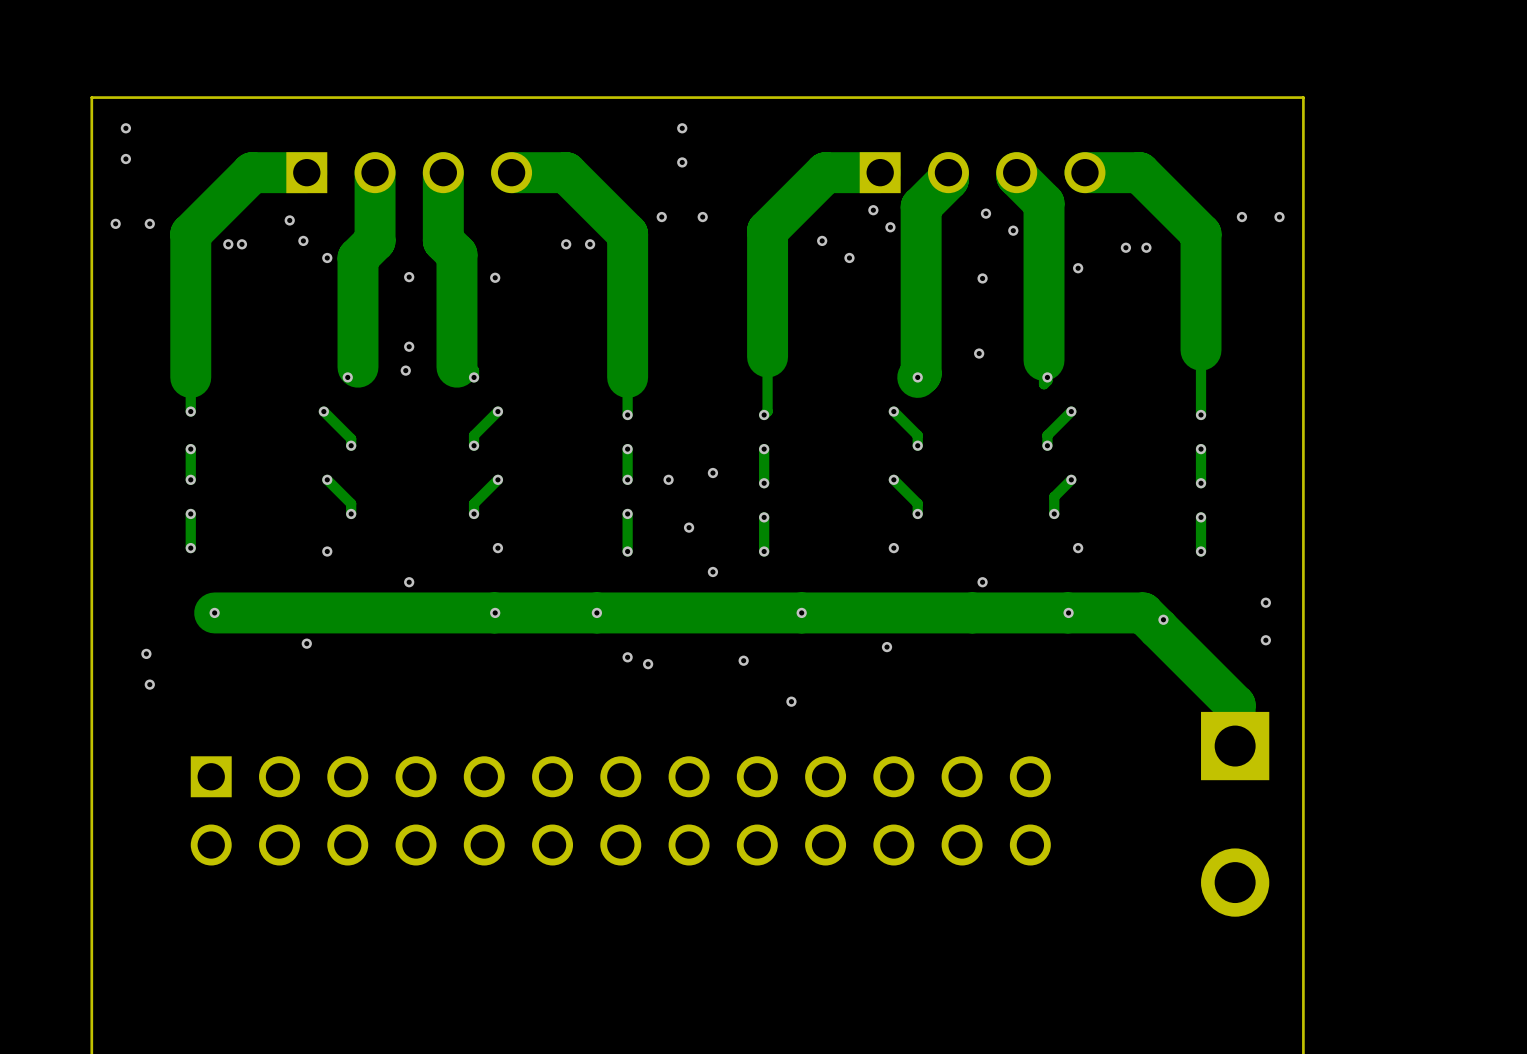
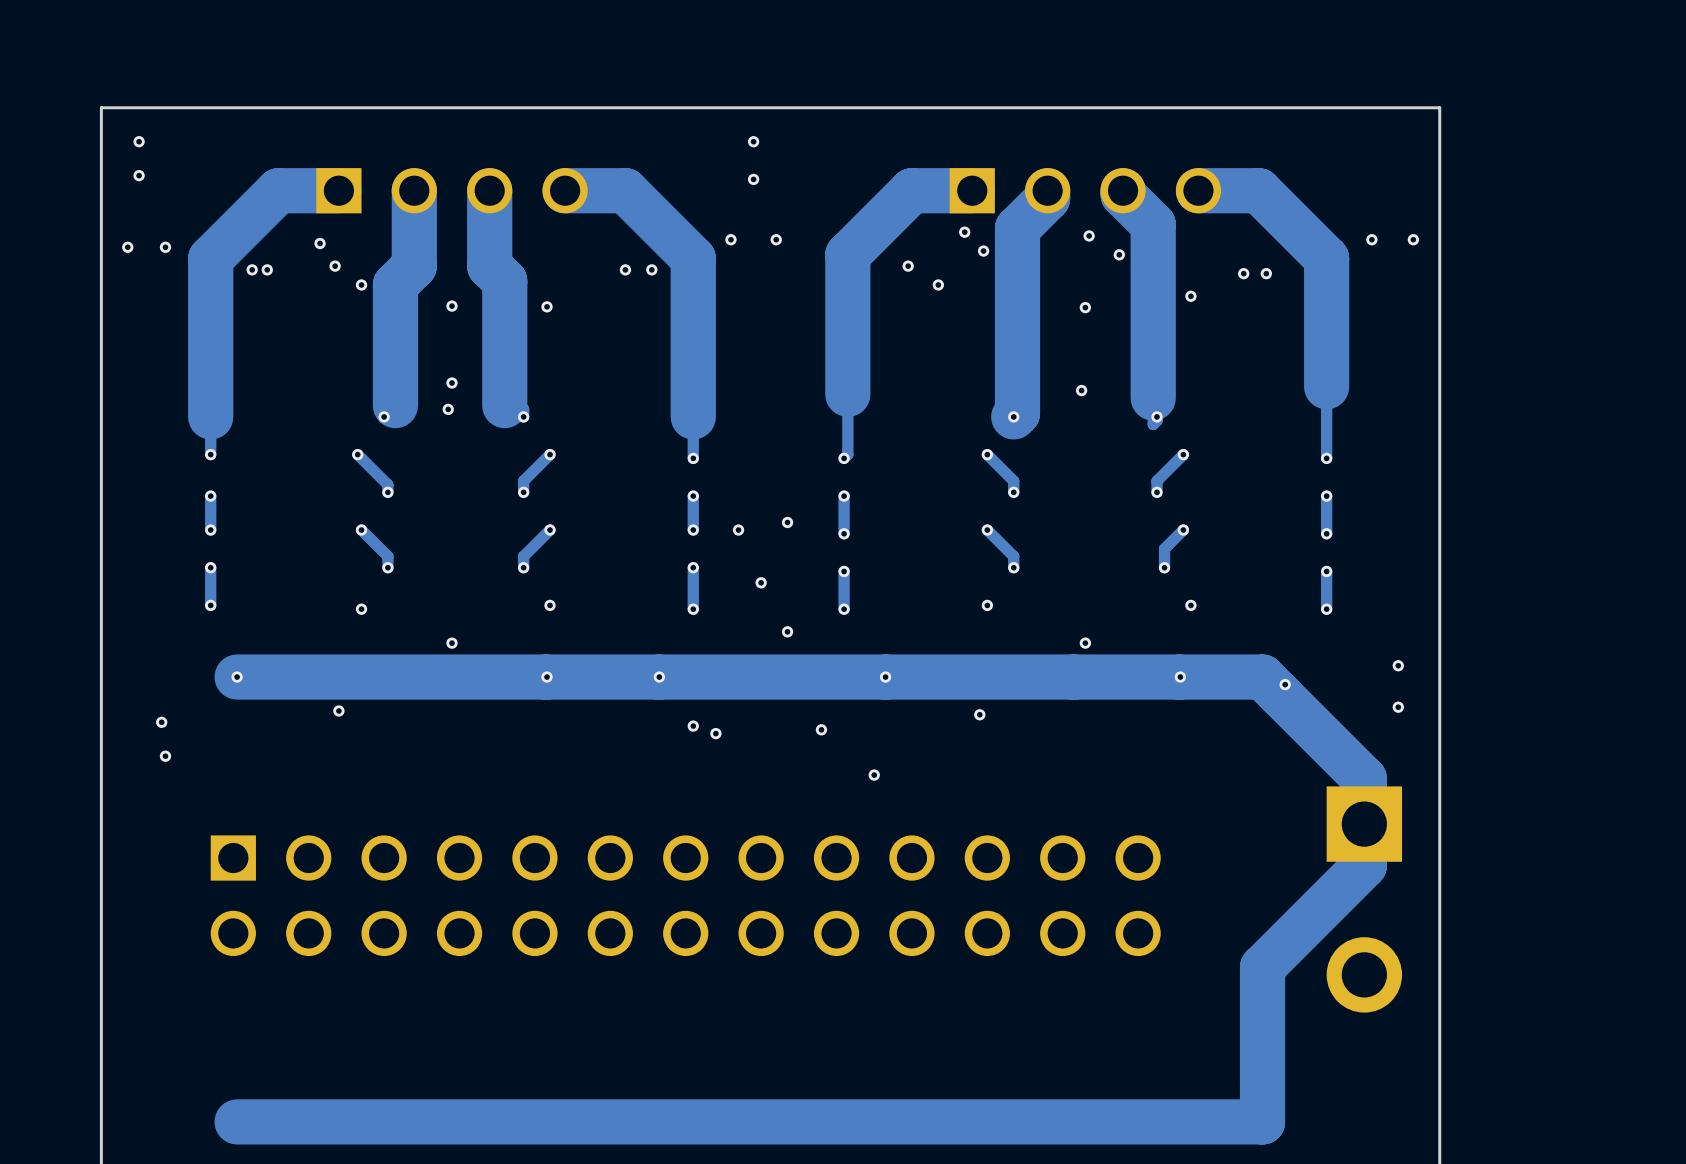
track: none -> (1364, 824) (1364, 865) (1262, 967) (1262, 1121) (237, 1121)

